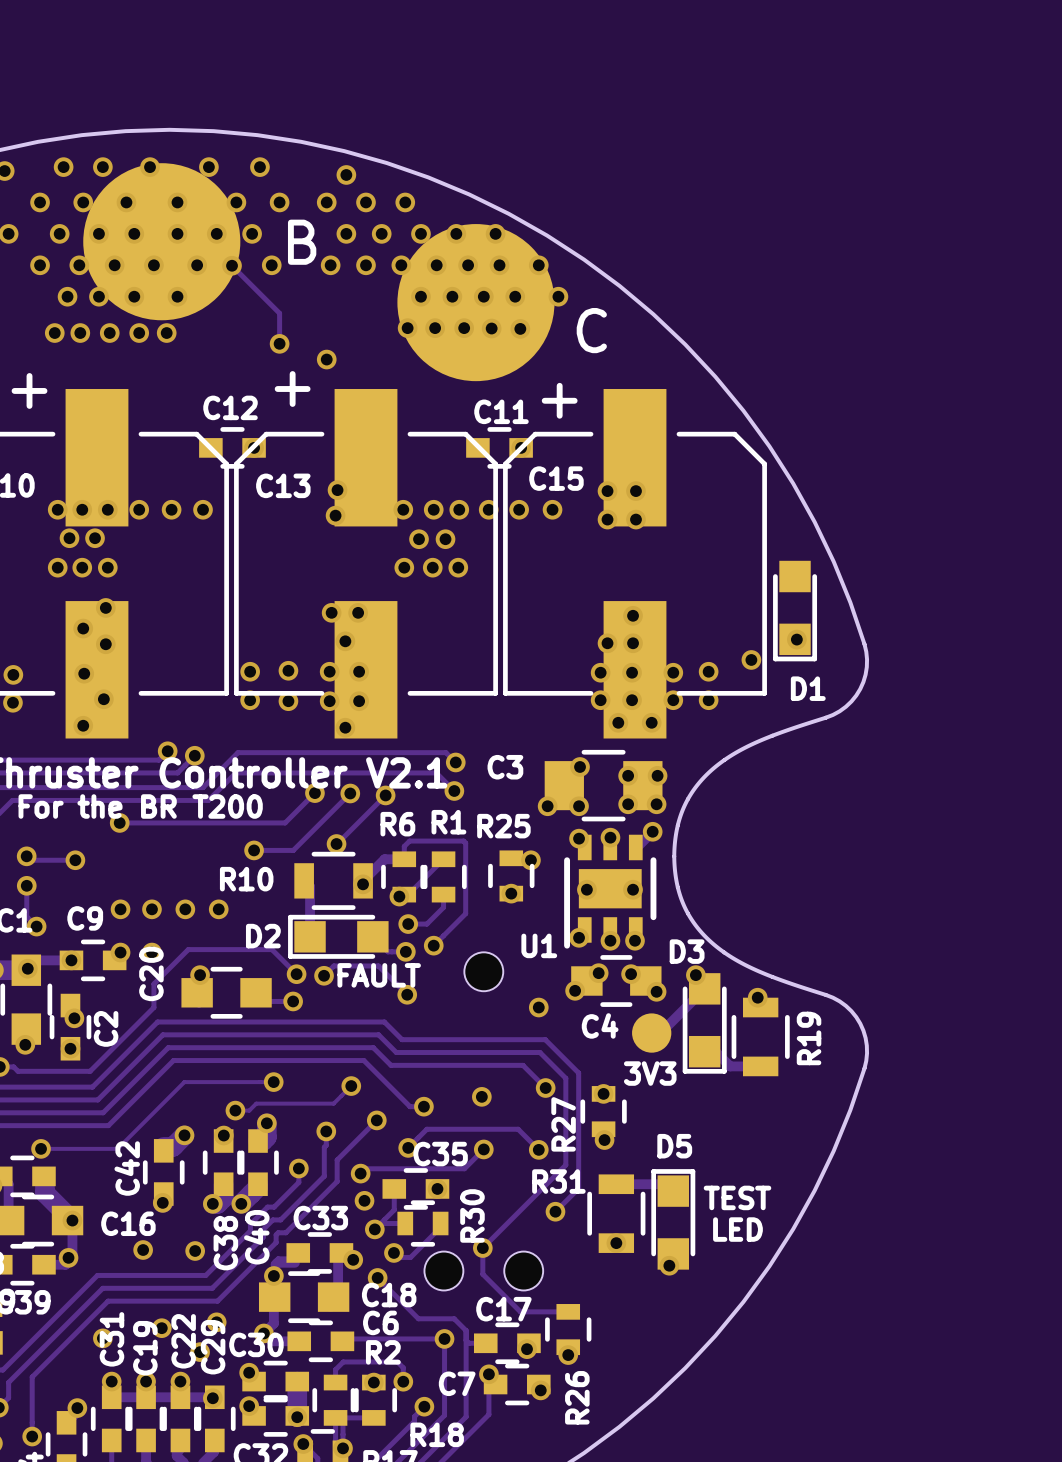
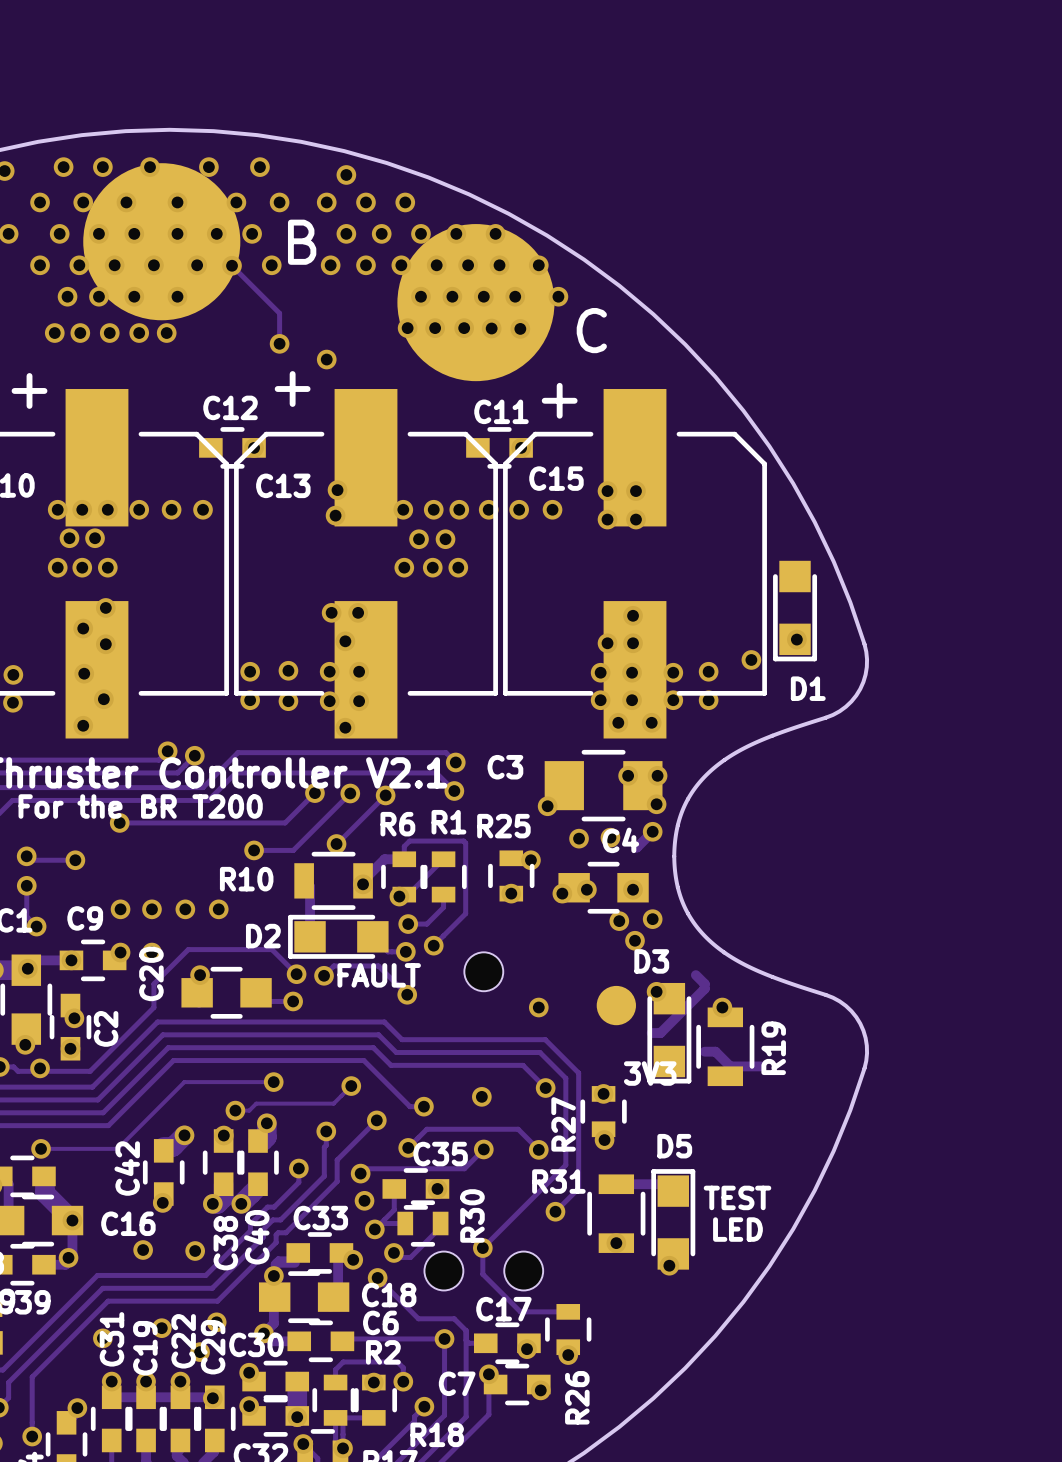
via: (580, 766) -> none
via: (628, 804) -> none
via: (579, 806) -> none
U1: (610, 891) -> none
via: none -> (562, 893)
via: none -> (652, 919)
via: (579, 937) -> none
via position: (610, 940) -> (619, 921)
via: (598, 973) -> none
via: (631, 974) -> none
via: (695, 975) -> none
C4 position: (616, 981) -> (603, 887)
via: (575, 990) -> none
via: (757, 997) -> none
via: none -> (722, 1007)
D3 position: (704, 1023) -> (669, 1033)
C4 name position: C4 (600, 1025) -> C4 (620, 840)
part position: (651, 1033) -> (616, 1005)
R19 position: (760, 1036) -> (725, 1046)
via: none -> (40, 1068)

